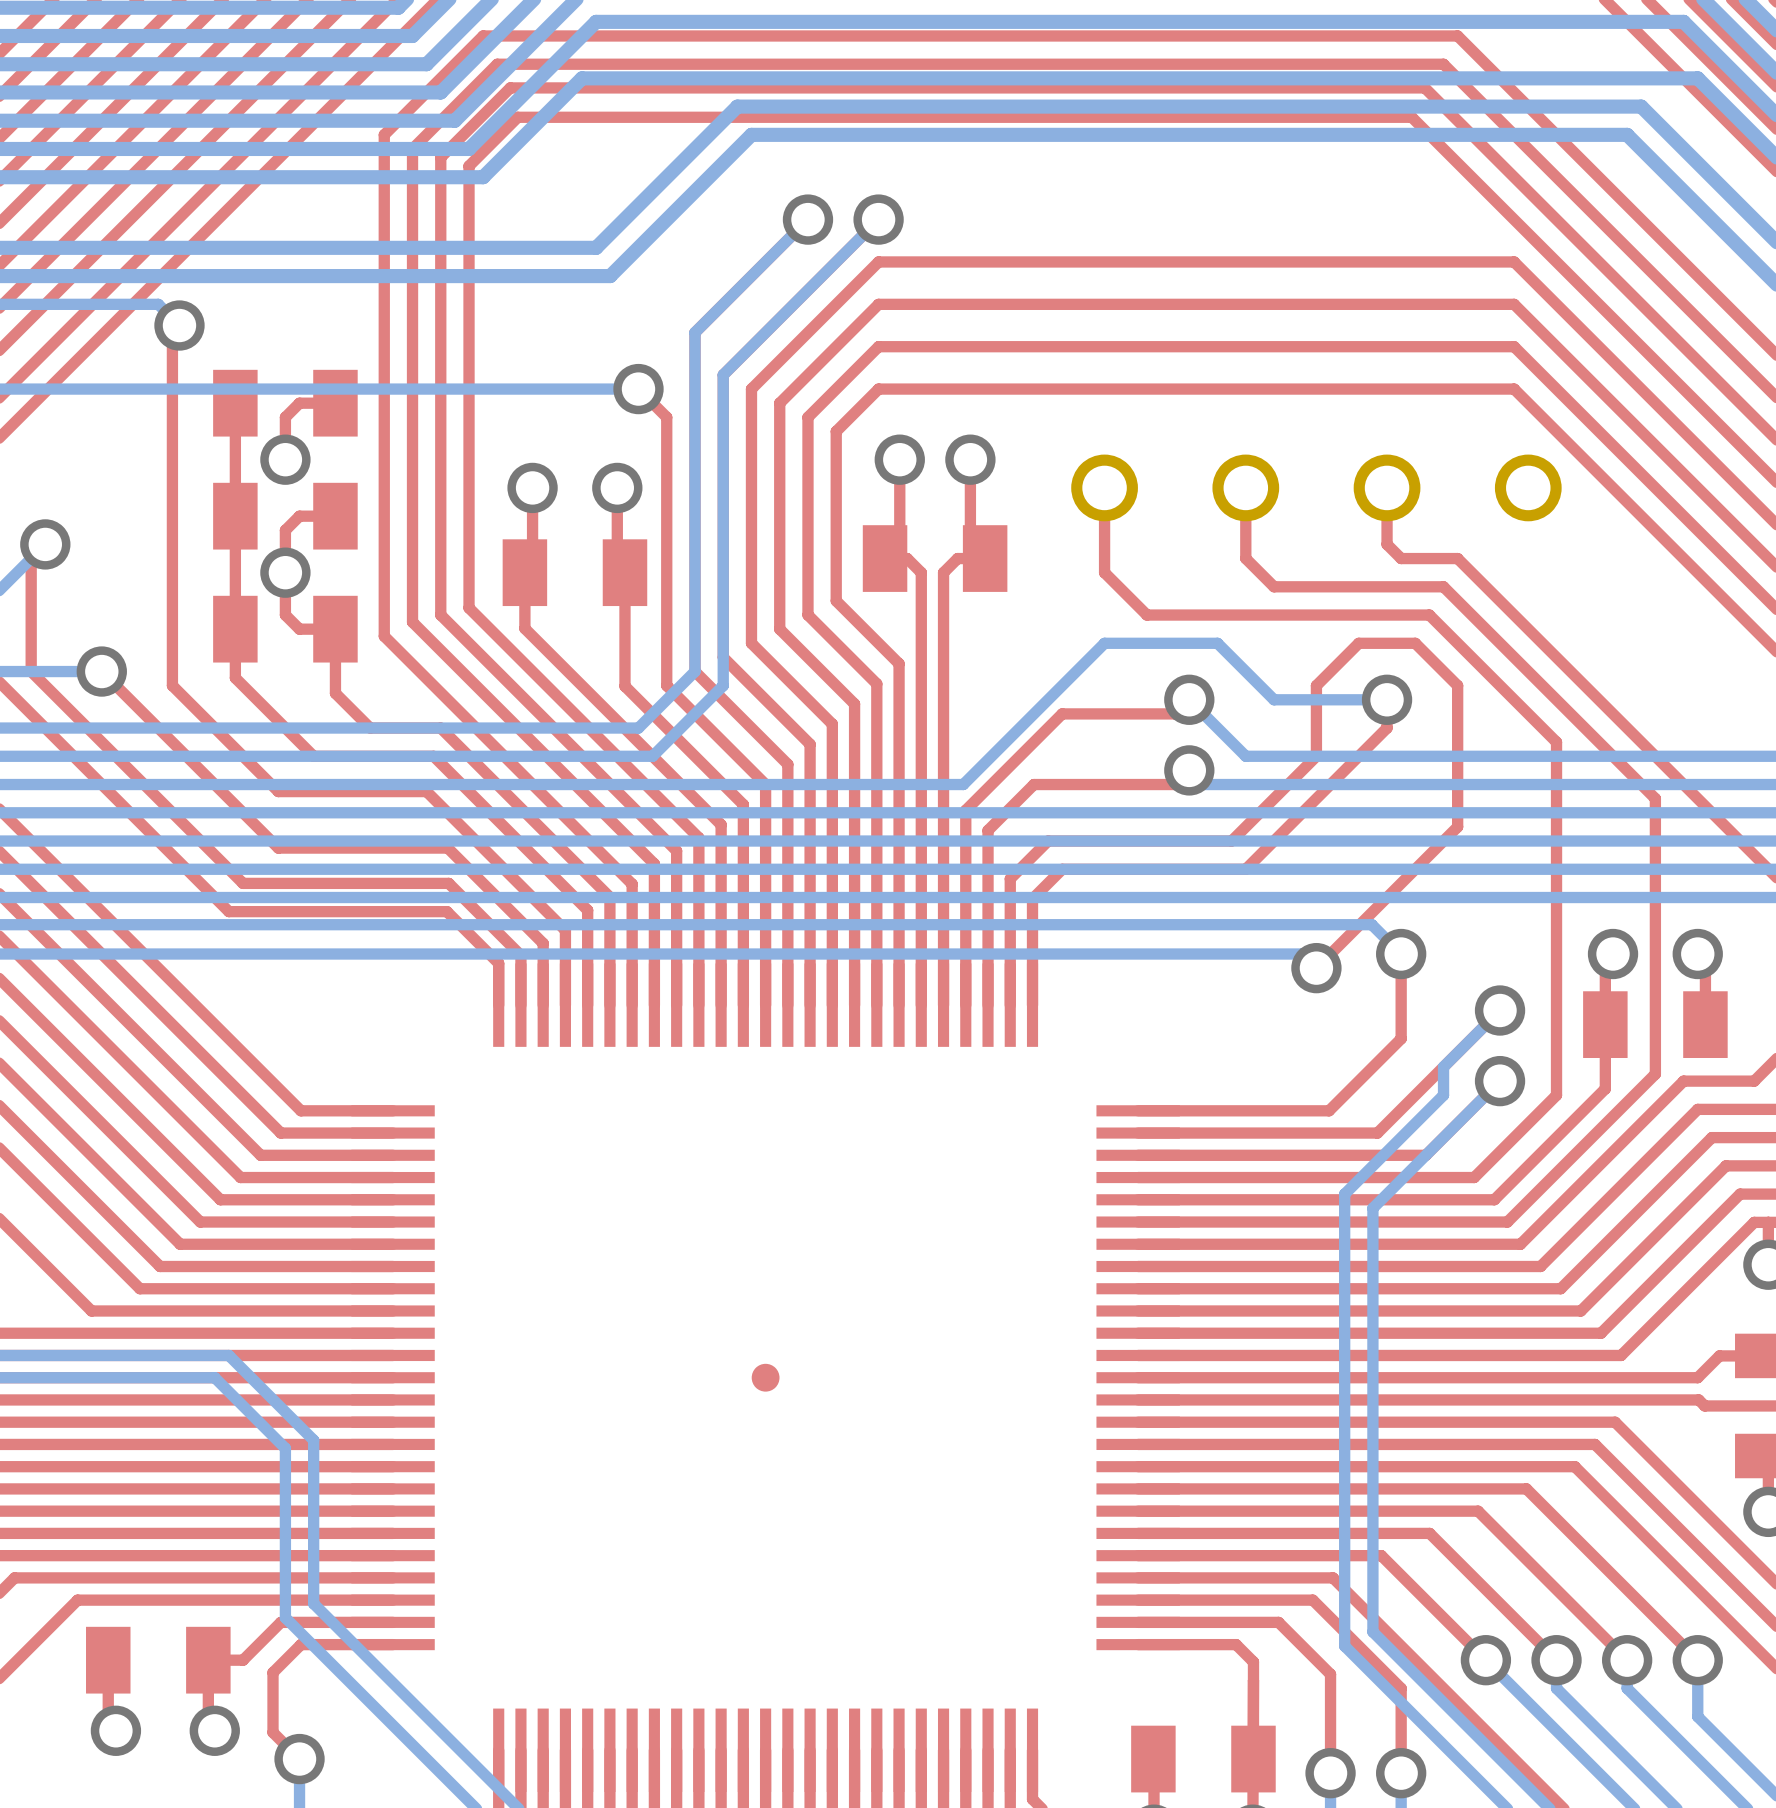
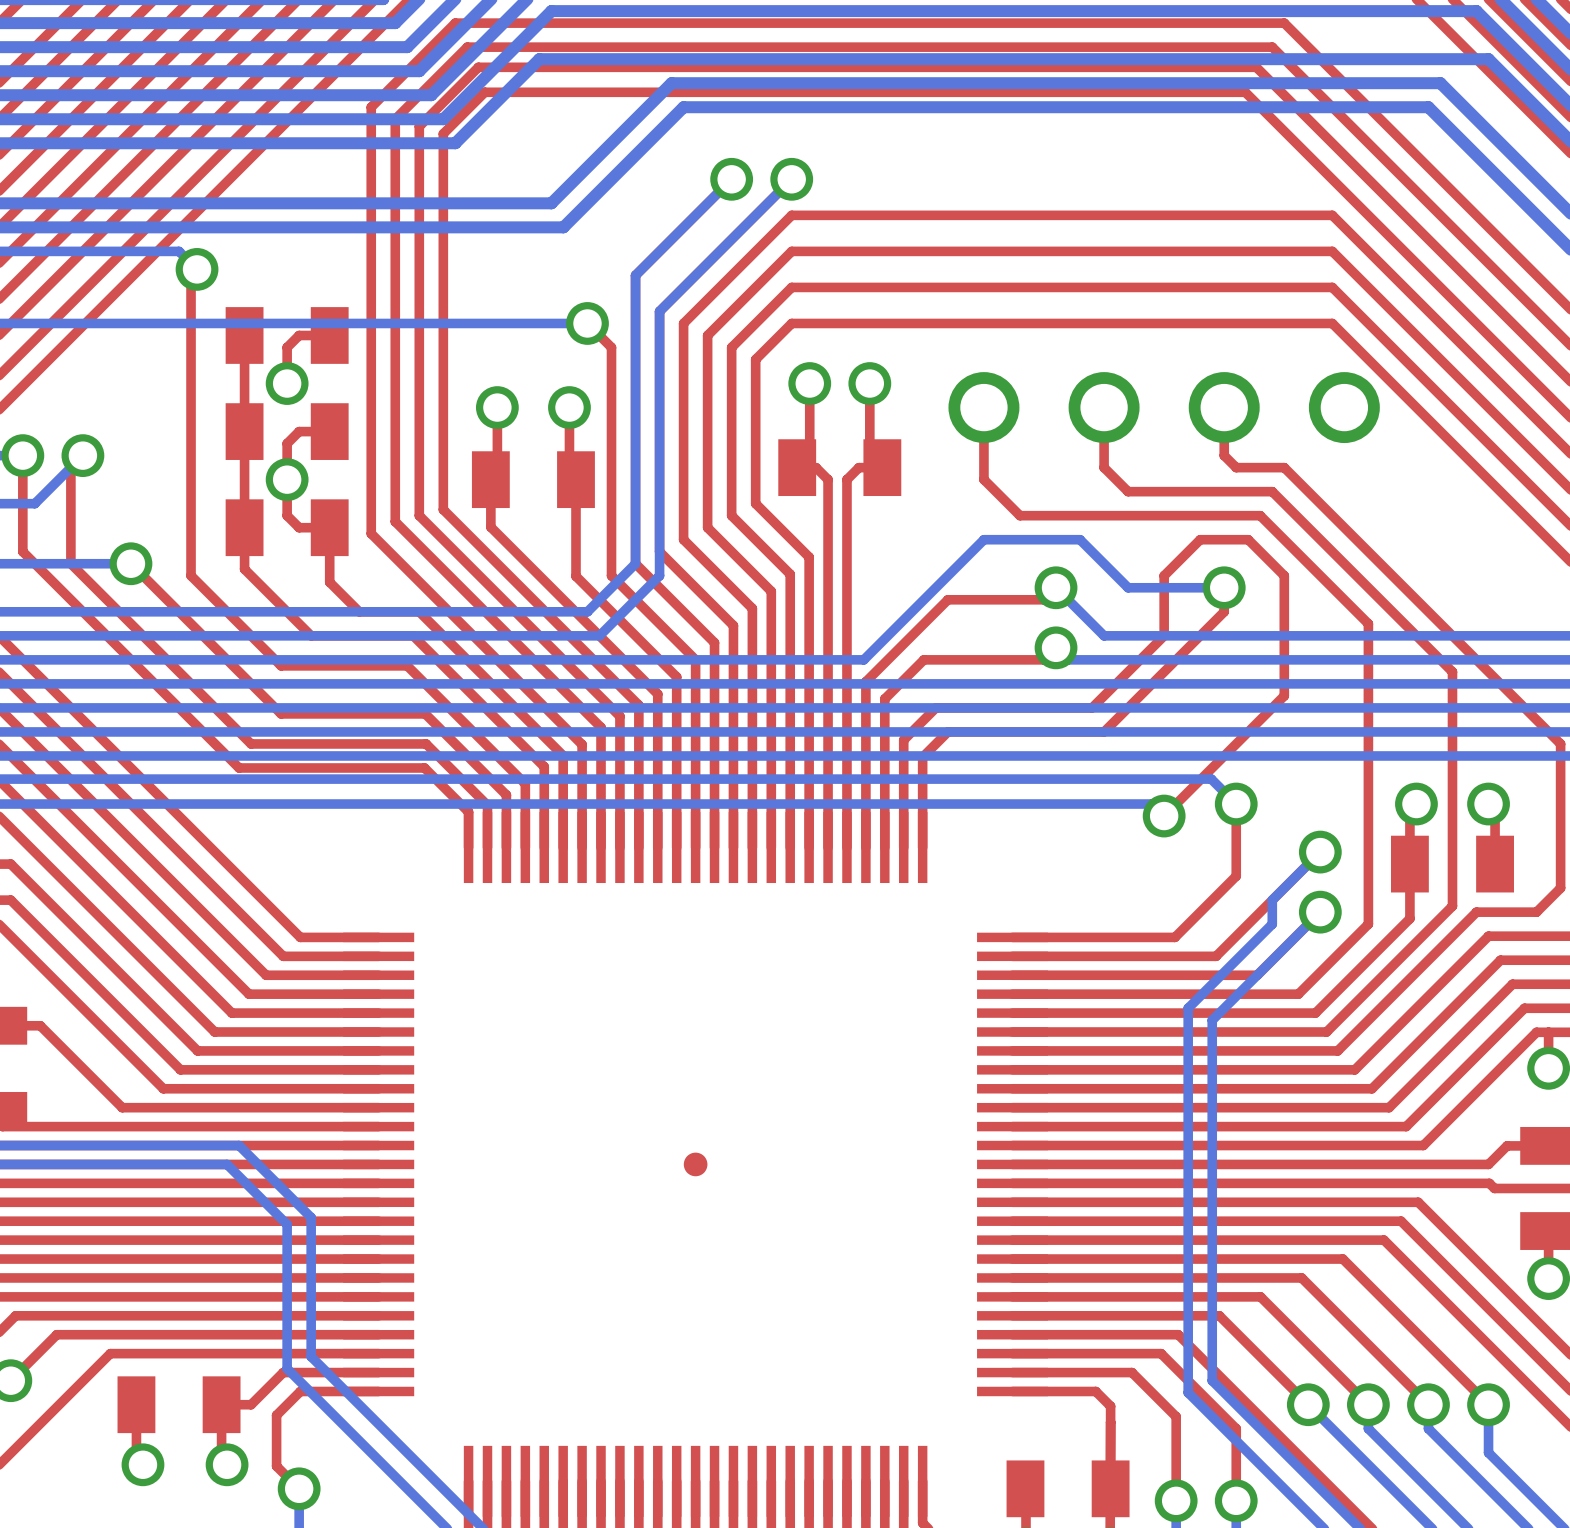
part footprint: [1071, 454, 1562, 522] -> [948, 372, 1380, 444]

